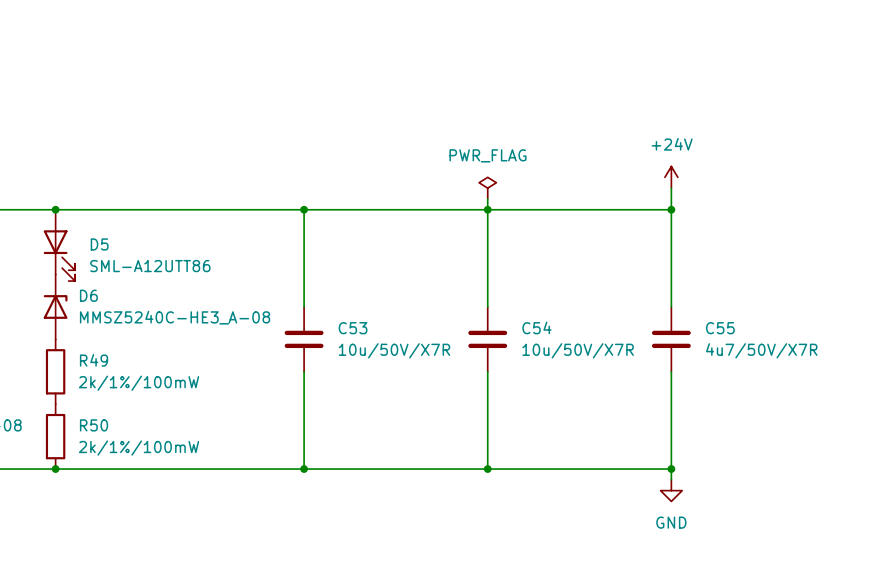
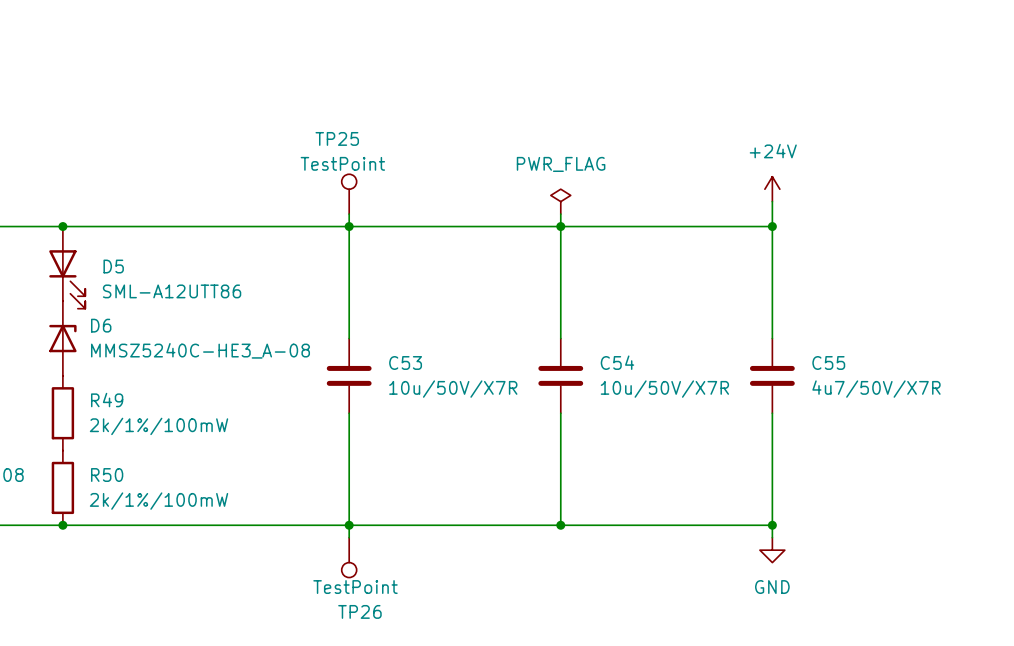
TP25: none -> TestPoint (349, 194)
wire: none -> (349, 214) (349, 226)
wire: none -> (349, 525) (349, 537)
TP26: none -> TestPoint (349, 557)

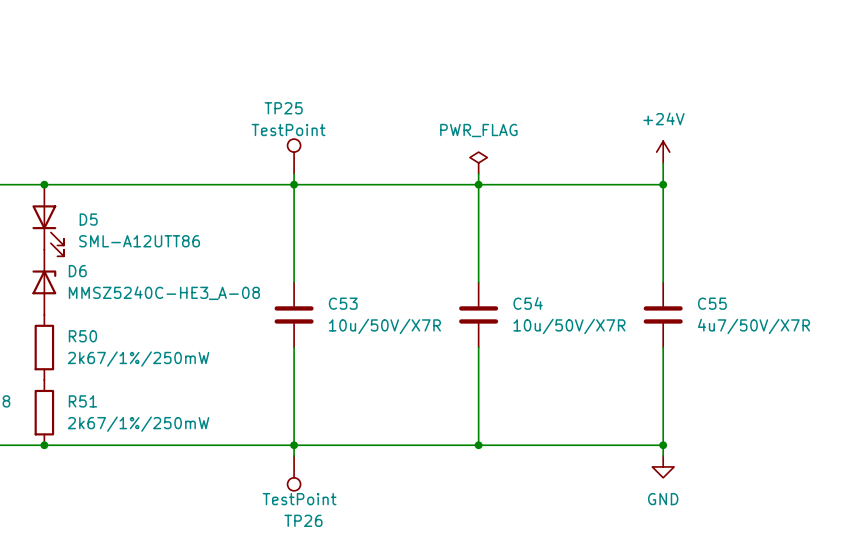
R49 name: R49 (107, 400) -> R50 (82, 336)
R49 value: 2k/1%/100mW (159, 426) -> 2k67/1%/250mW (138, 359)
R50 name: R50 (107, 475) -> R51 (82, 401)
R50 value: 2k/1%/100mW (159, 501) -> 2k67/1%/250mW (138, 424)

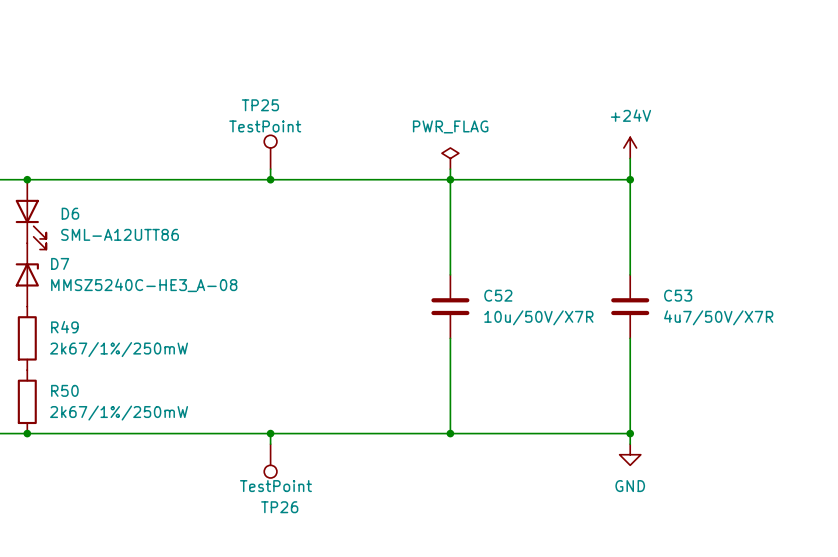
wire: (294, 184) (294, 282) -> none
D5 name: D5 (88, 219) -> D6 (70, 213)
D6 name: D6 (77, 271) -> D7 (60, 263)
C54 name: C54 (528, 303) -> C52 (498, 295)
C55 name: C55 (712, 303) -> C53 (678, 295)
C53: 10u/50V/X7R (294, 314) -> none
R50 name: R50 (82, 336) -> R49 (64, 327)
wire: (294, 347) (294, 445) -> none
R51 name: R51 (82, 401) -> R50 (64, 390)

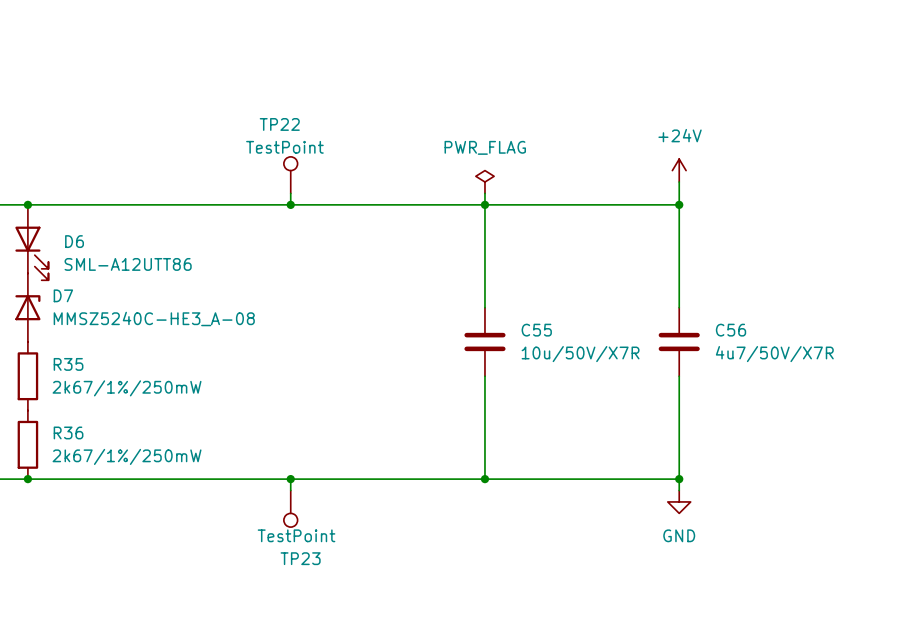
TP25 name: TP25 (260, 105) -> TP22 (279, 124)
C52 name: C52 (498, 295) -> C55 (536, 330)
C53 name: C53 (678, 295) -> C56 (731, 330)
R49 name: R49 (64, 327) -> R35 (68, 364)
R50 name: R50 (64, 390) -> R36 (68, 432)
TP26 name: TP26 (279, 507) -> TP23 (300, 558)

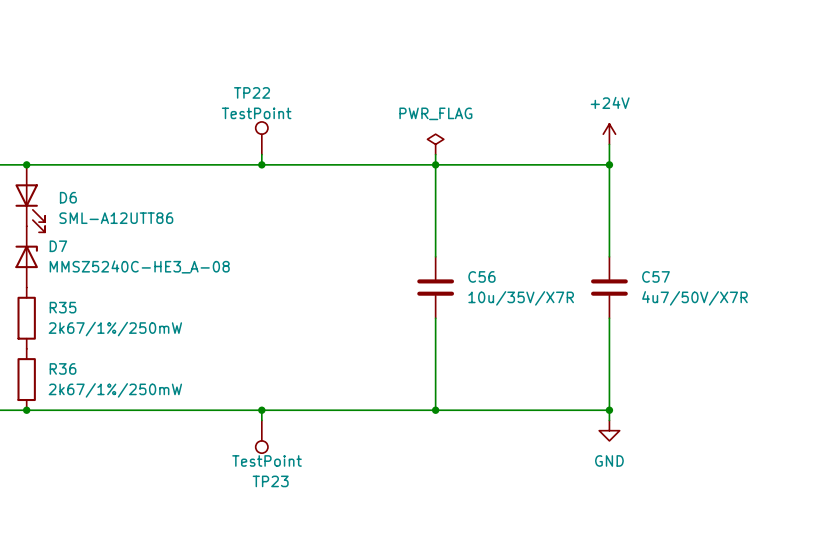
C55 name: C55 (536, 330) -> C56 (481, 276)
C56 name: C56 (731, 330) -> C57 (656, 276)
C55 value: 10u/50V/X7R (580, 354) -> 10u/35V/X7R (521, 298)

